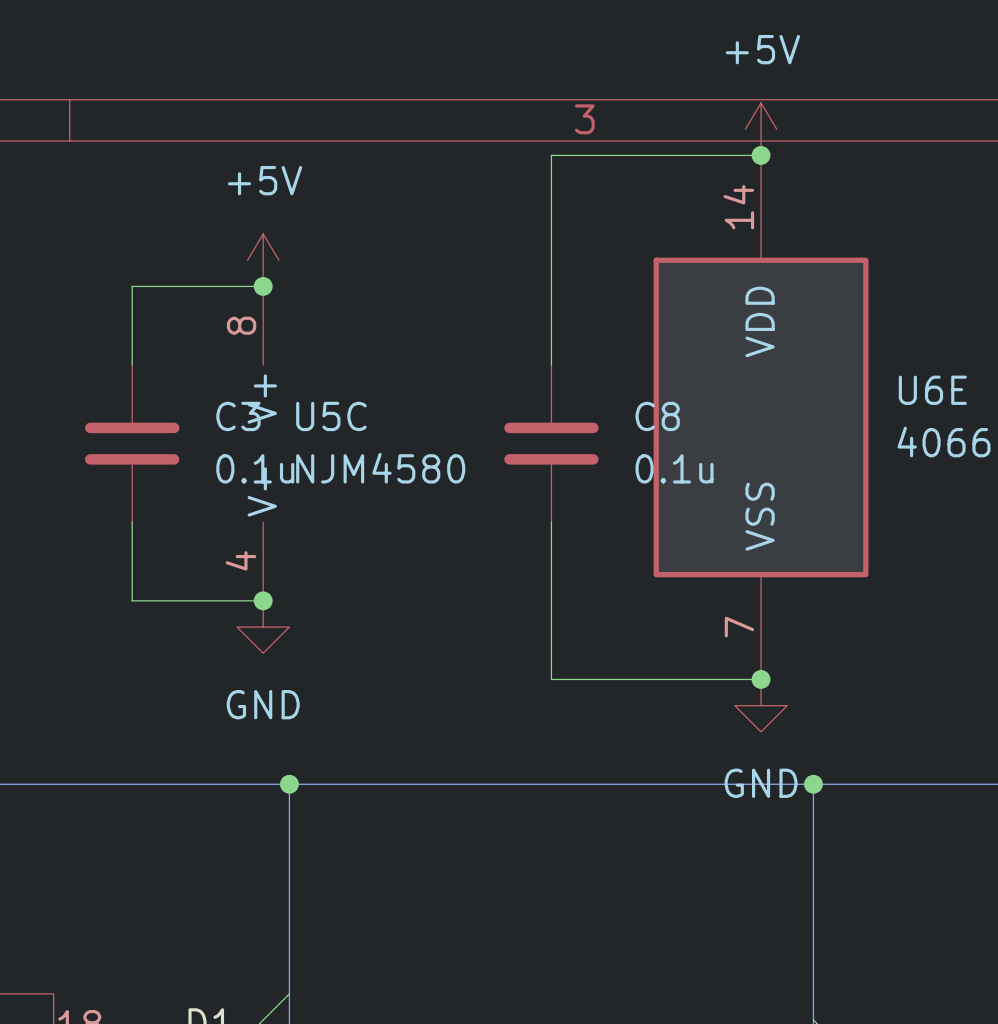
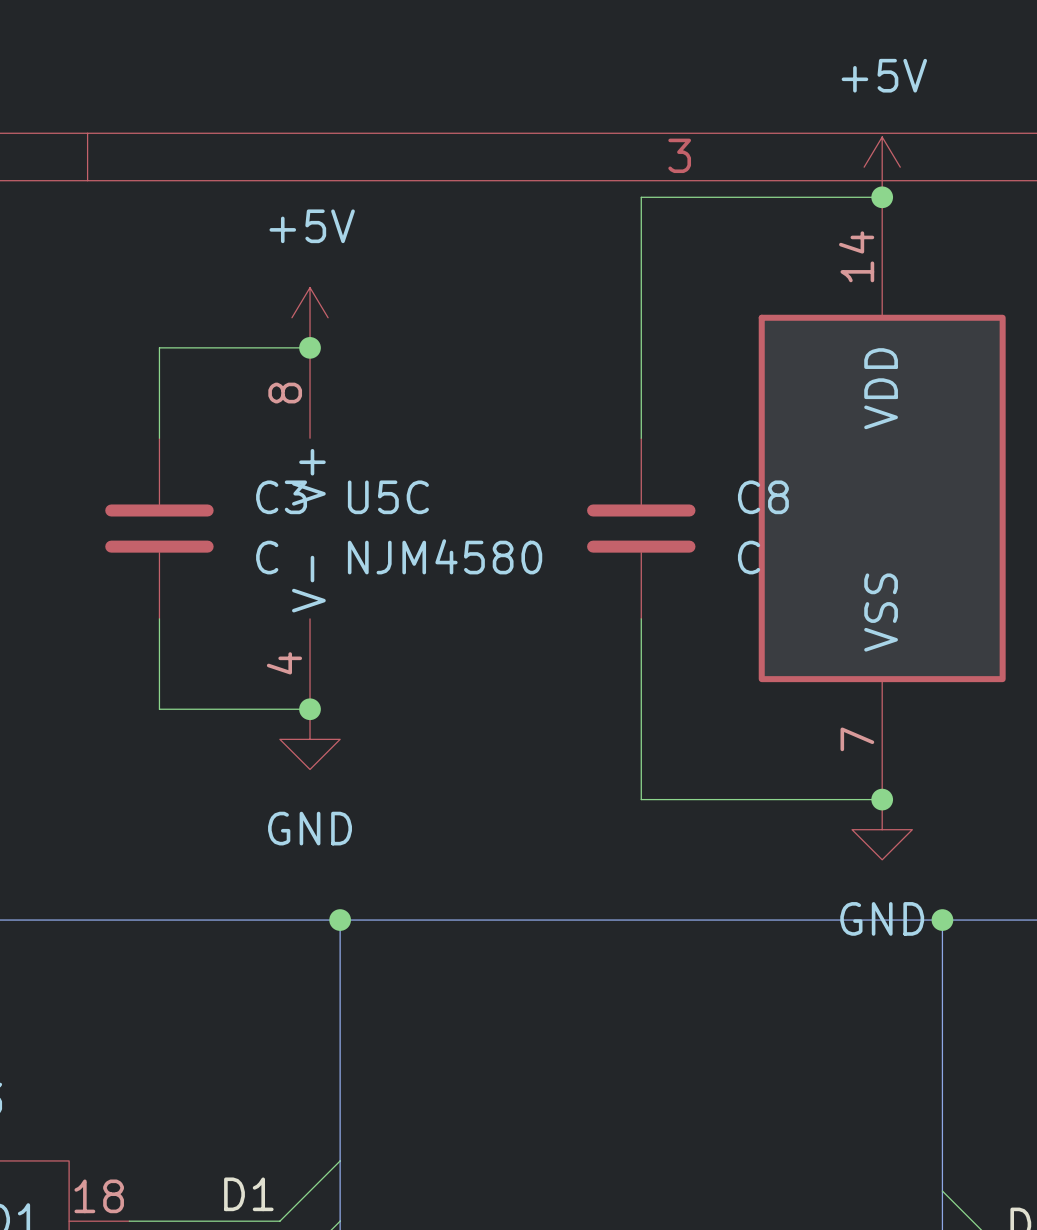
C3 value: 0.1u (255, 468) -> C (267, 557)
C8 value: 0.1u (674, 468) -> C (749, 557)

